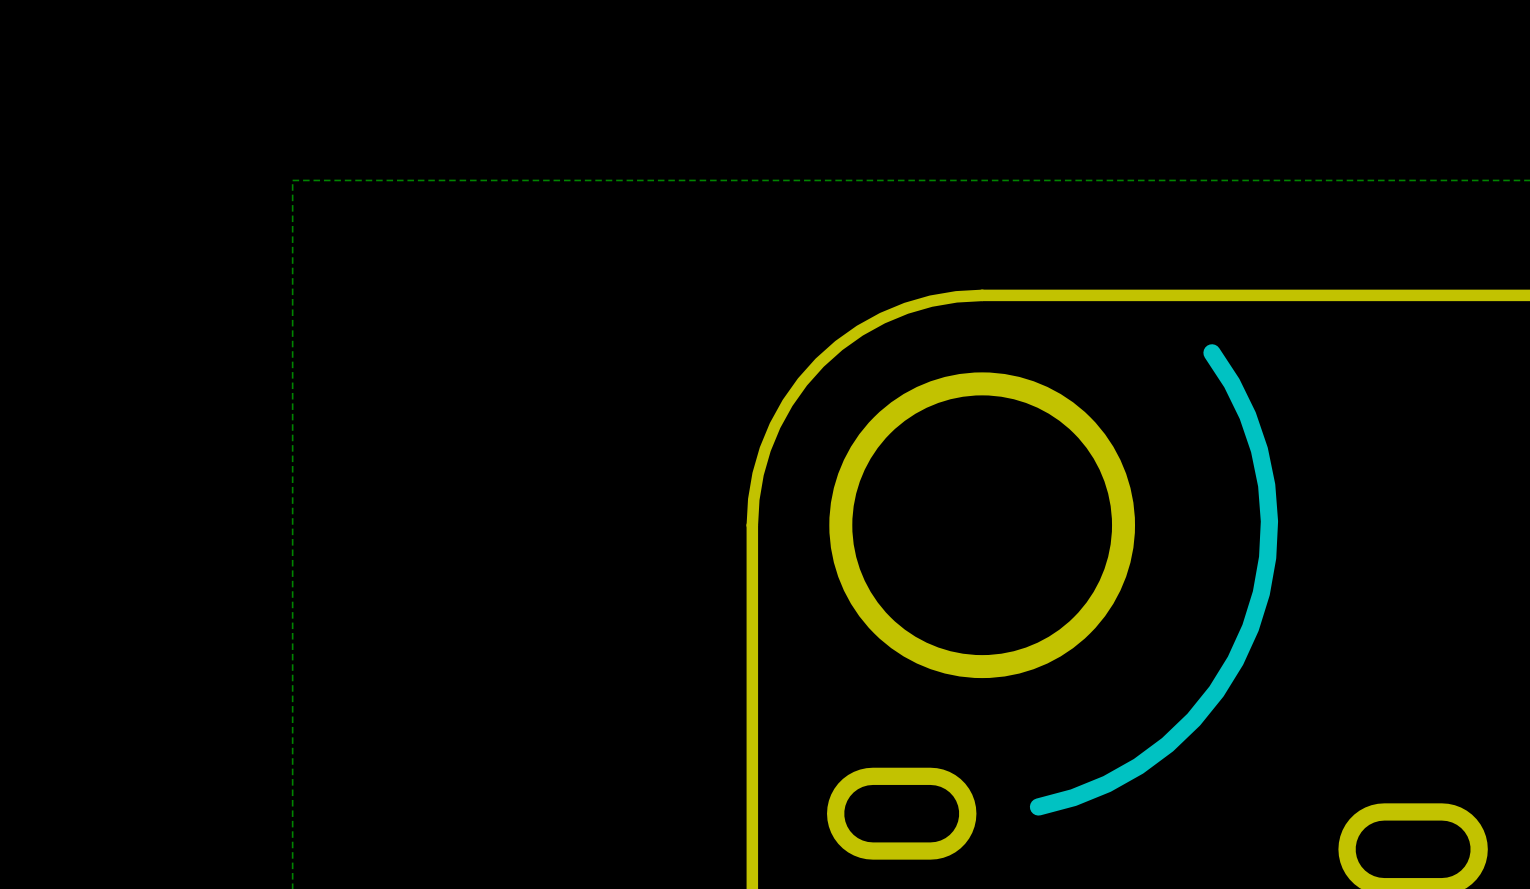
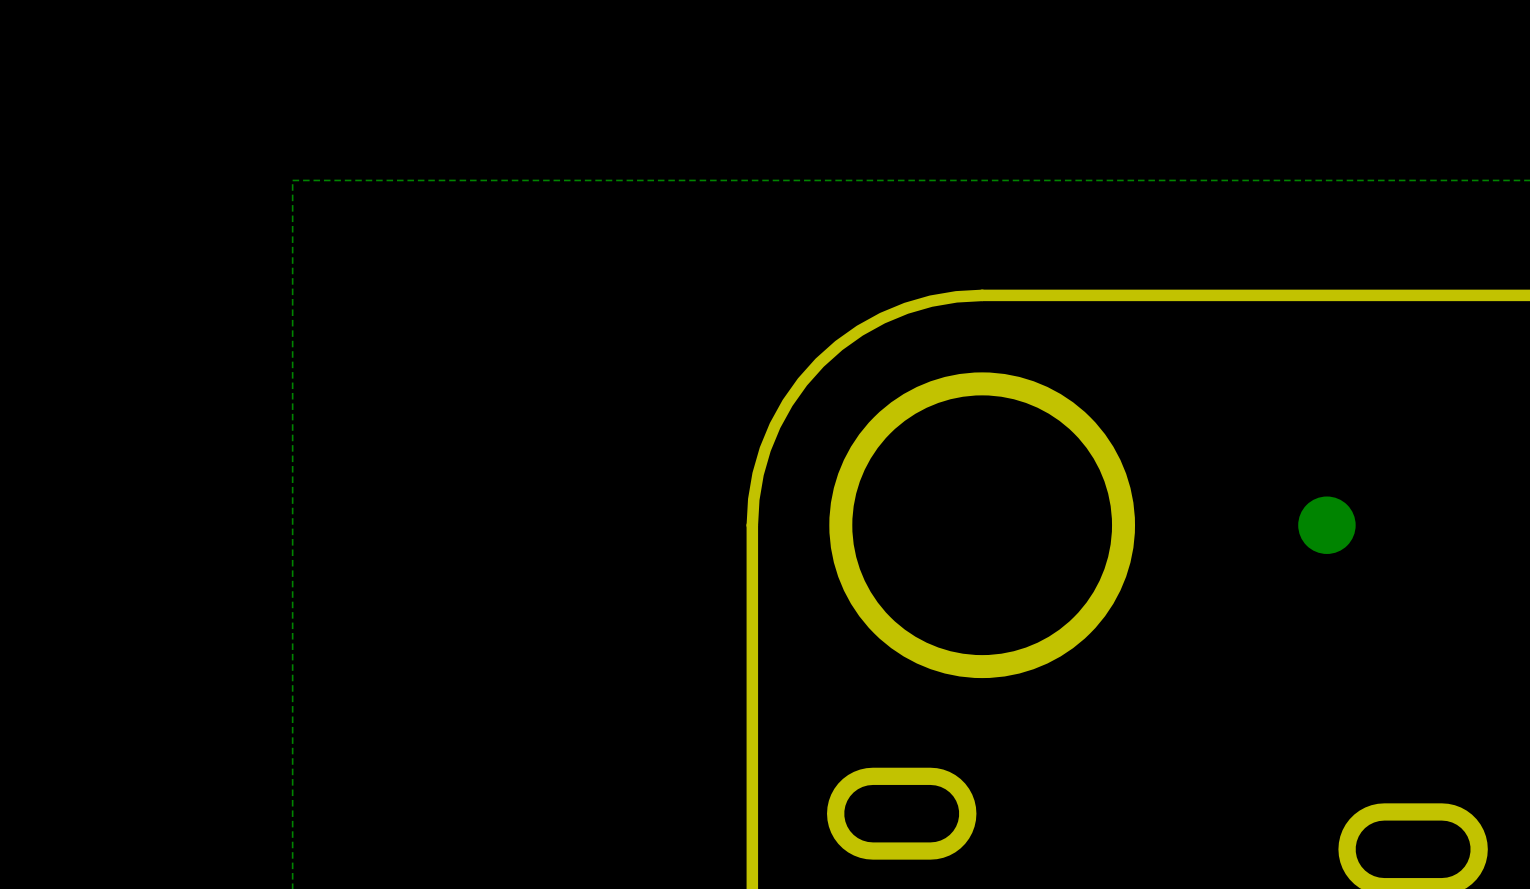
line: (1212, 352) (1231, 383) (1247, 415) (1259, 449) (1266, 485) (1269, 521) (1267, 557) (1261, 593) (1250, 627) (1235, 660) (1216, 691) (1193, 719) (1167, 744) (1138, 766) (1107, 783) (1073, 797) (1038, 806) -> none
part: none -> (1326, 525)

